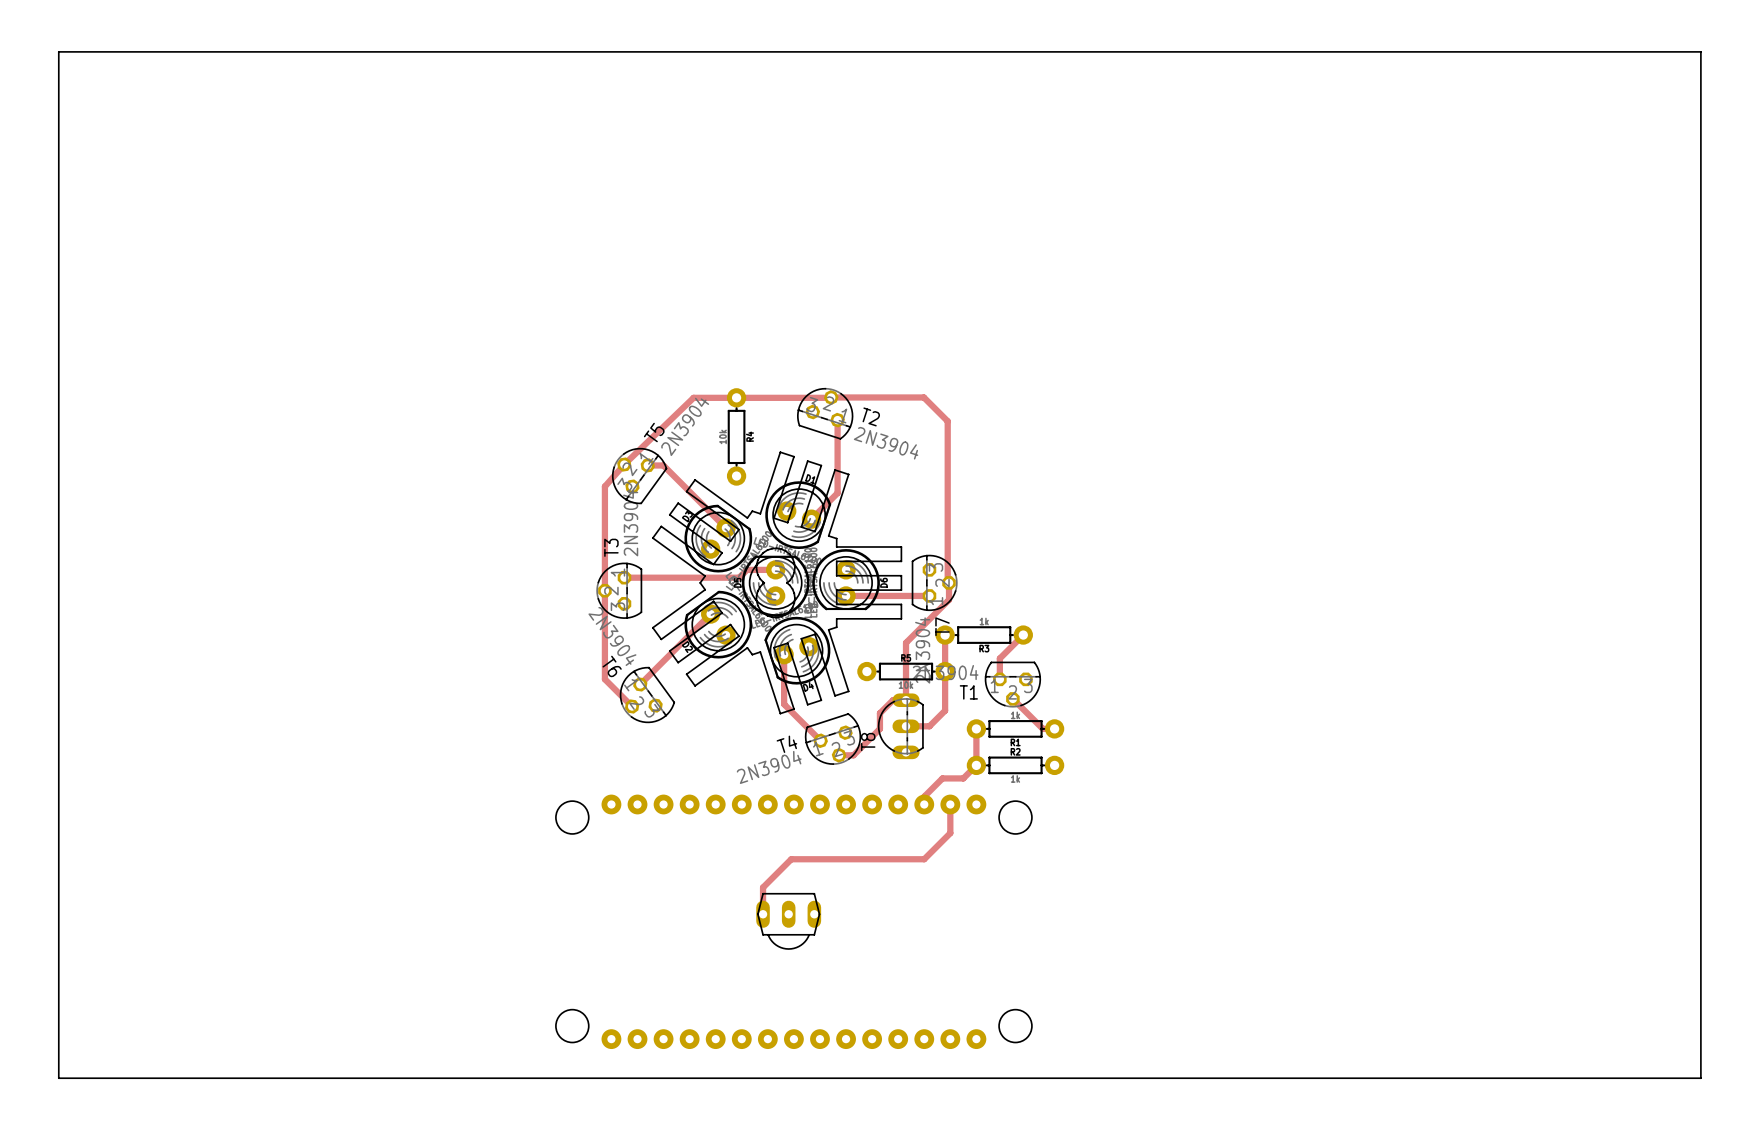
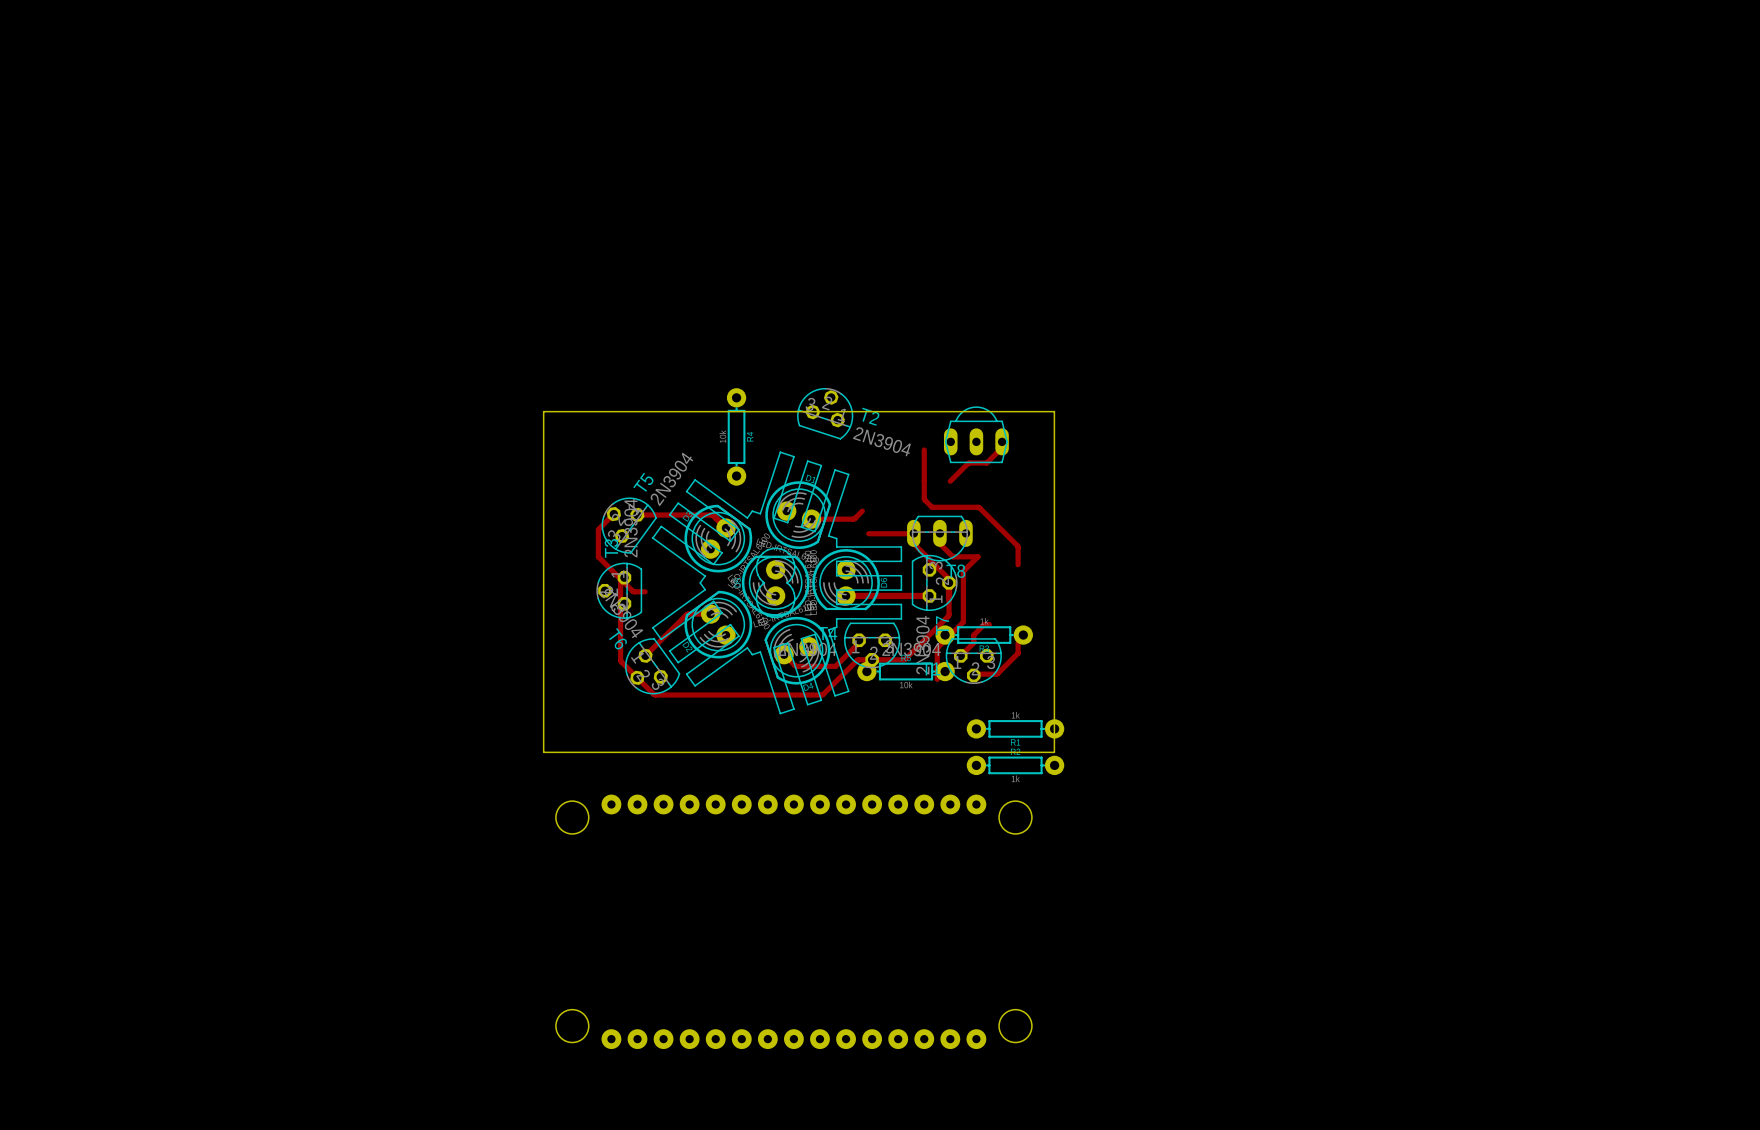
board edge: (58, 51) (1700, 51) (1700, 1078) (58, 1078) (58, 51) -> none
board edge: none -> (543, 411) (1054, 411) (1054, 752) (543, 752) (543, 411)
track: (837, 420) (837, 493) (811, 519) -> (862, 511) (853, 519) (811, 519)
part: none -> (976, 434)
track: none -> (1002, 441) (1001, 448) (986, 463) (968, 463) (950, 481)
track: none -> (924, 449) (924, 500) (932, 507) (979, 507) (1017, 545) (1018, 564)
track: (647, 465) (663, 465) (713, 515) -> (637, 515) (713, 515)
T5 position: (639, 476) -> (629, 525)
track: none -> (613, 514) (598, 529) (598, 556) (632, 591) (645, 591)
track: none -> (868, 533) (913, 533)
track: none -> (939, 533) (940, 544) (952, 556) (977, 556) (963, 571) (963, 622) (937, 648) (937, 679)
track: (775, 569) (746, 569) (739, 577) (624, 577) -> none
track: (949, 582) (947, 421) (923, 397) (693, 397) (624, 464) (604, 486) (604, 679) (632, 706) -> (949, 582) (948, 578) (913, 543) (913, 533)
track: (949, 599) (906, 642) (906, 700) (892, 700) (879, 713) (879, 728) (853, 755) (839, 755) -> (949, 599) (948, 616) (905, 659) (857, 660) (822, 694) (655, 695) (620, 660) (620, 579)
track: (710, 614) (640, 684) -> (710, 614) (686, 614) (645, 655)
track: none -> (989, 624) (983, 624) (973, 635) (973, 643) (960, 655)
track: (945, 635) (945, 710) (929, 726) (906, 726) -> none
track: (1023, 635) (999, 658) (999, 679) -> none
track: none -> (1018, 642) (1018, 653) (997, 673) (973, 675)
track: (784, 654) (784, 704) (820, 740) -> (784, 654) (796, 666) (835, 666) (858, 643) (859, 640)
T1 position: (1012, 684) -> (973, 661)
T6 position: (647, 695) -> (652, 666)
track: (1012, 698) (1042, 728) (1054, 728) -> none
T8 rotation: 0° (900, 726) -> 90° counterclockwise (939, 538)
T8 position: (900, 726) -> (939, 538)
track: (976, 728) (976, 765) (963, 778) (942, 778) (924, 796) (924, 804) -> none
T4 rotation: 0° (833, 739) -> 18° clockwise (872, 645)
T4 position: (833, 739) -> (872, 645)
track: (950, 804) (950, 833) (924, 859) (791, 859) (763, 887) (763, 914) -> none
part: (788, 921) -> none

